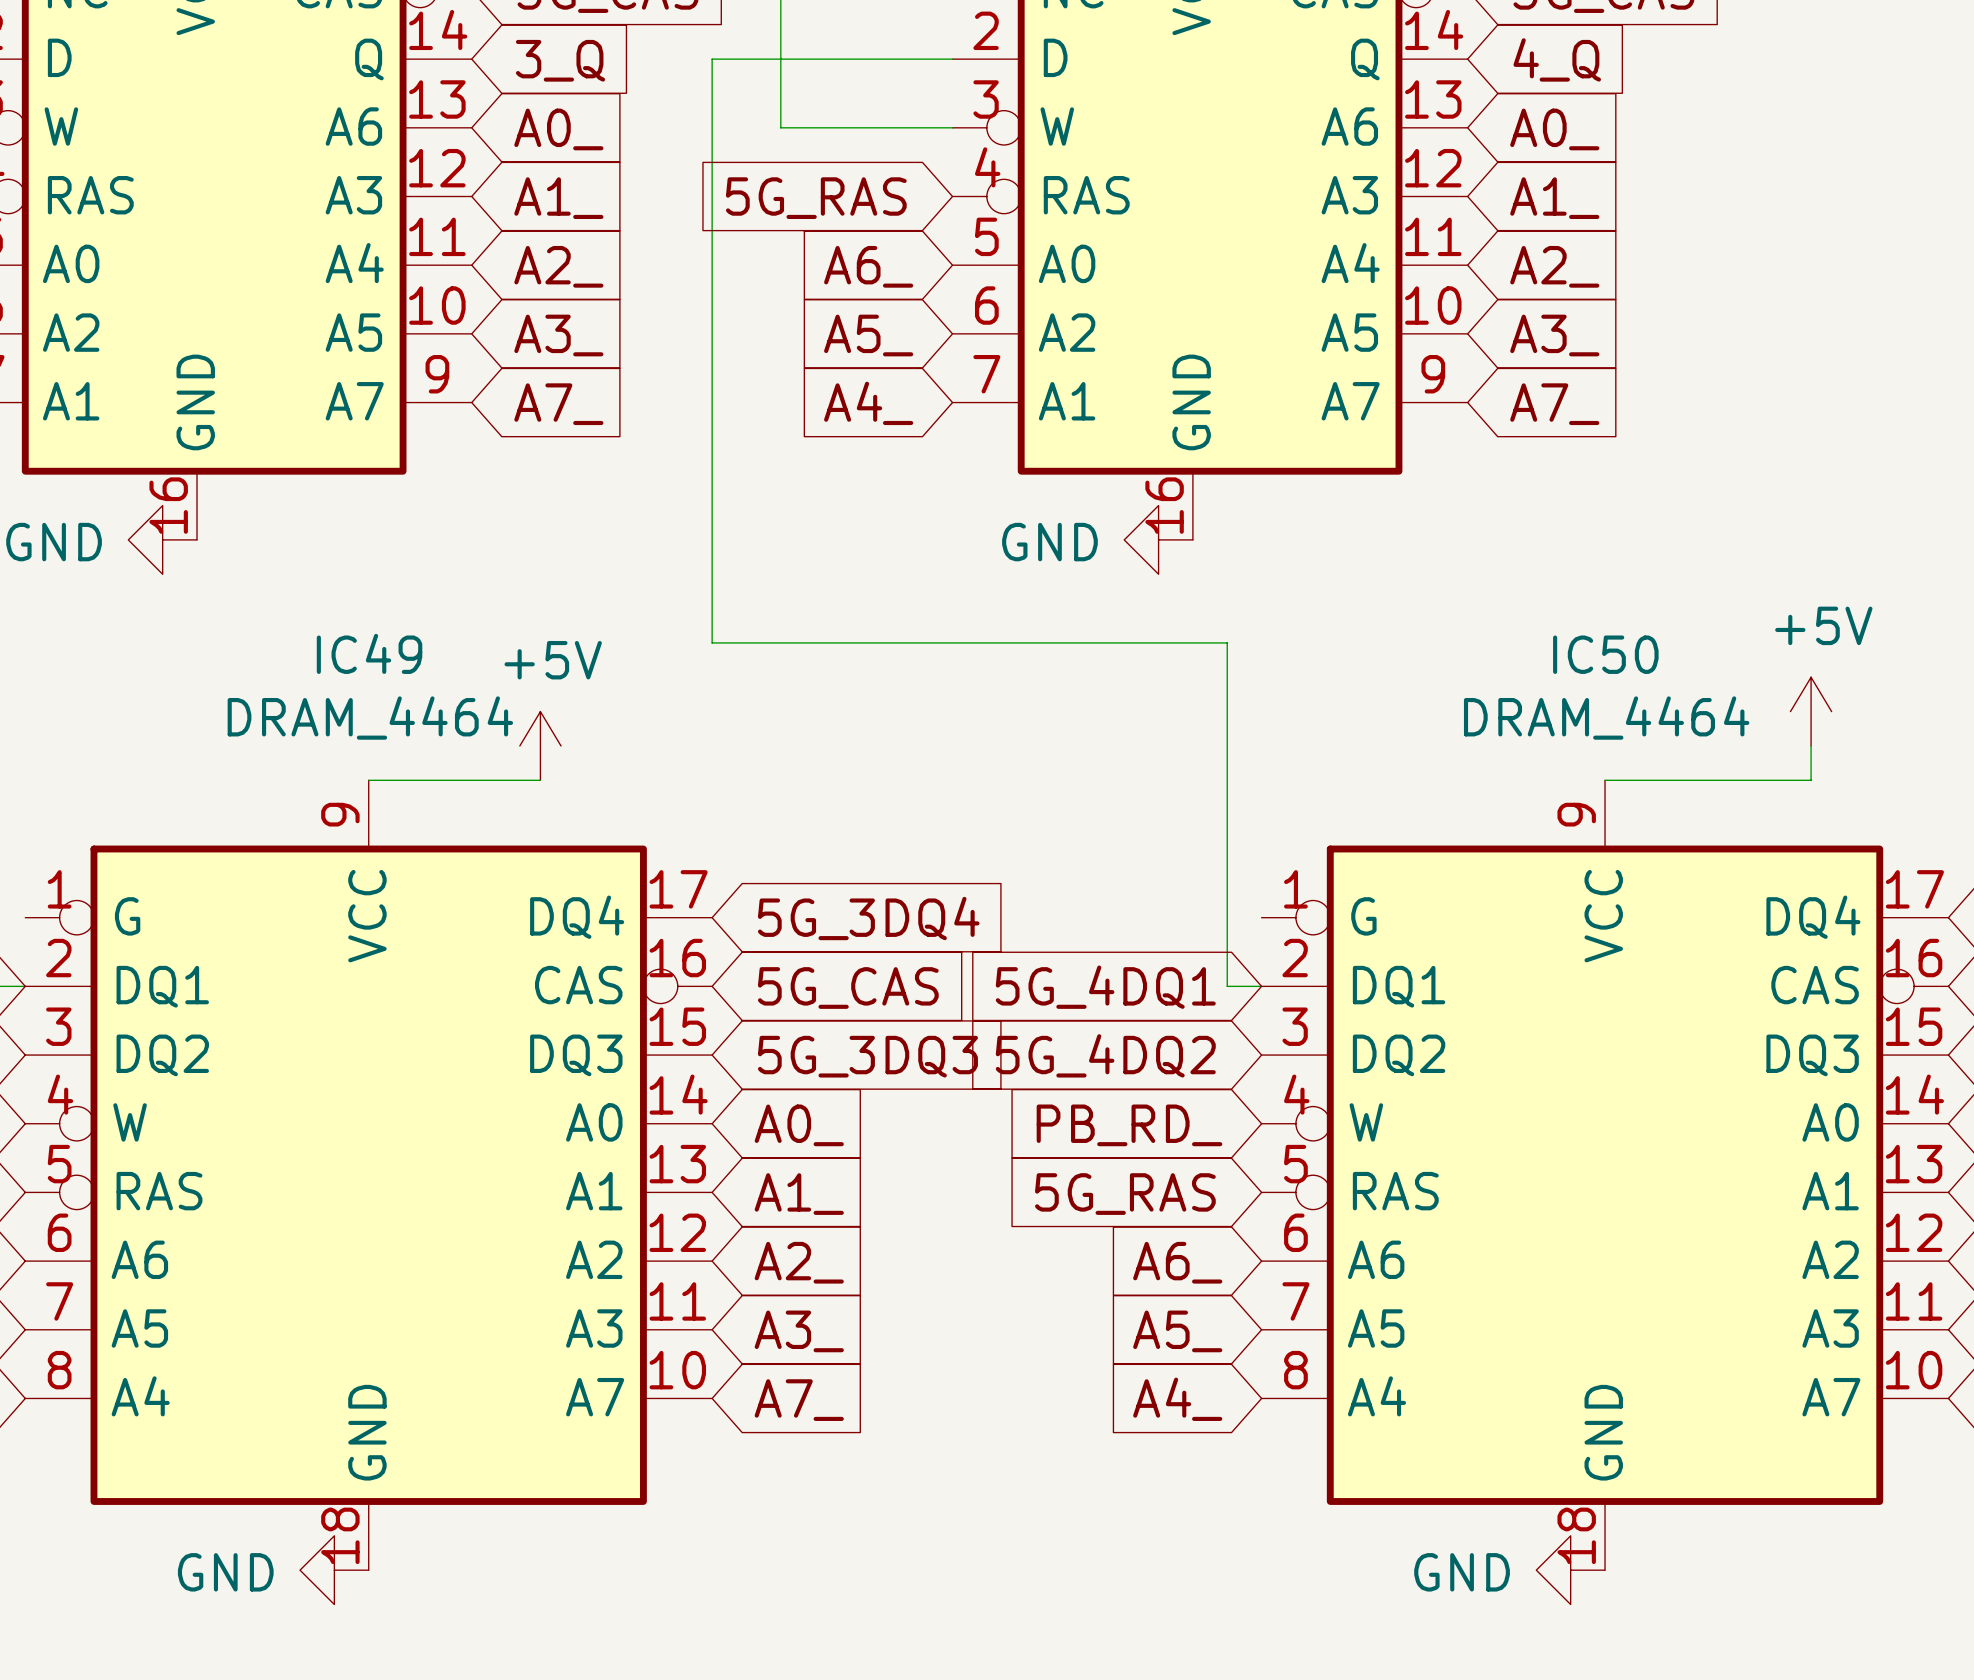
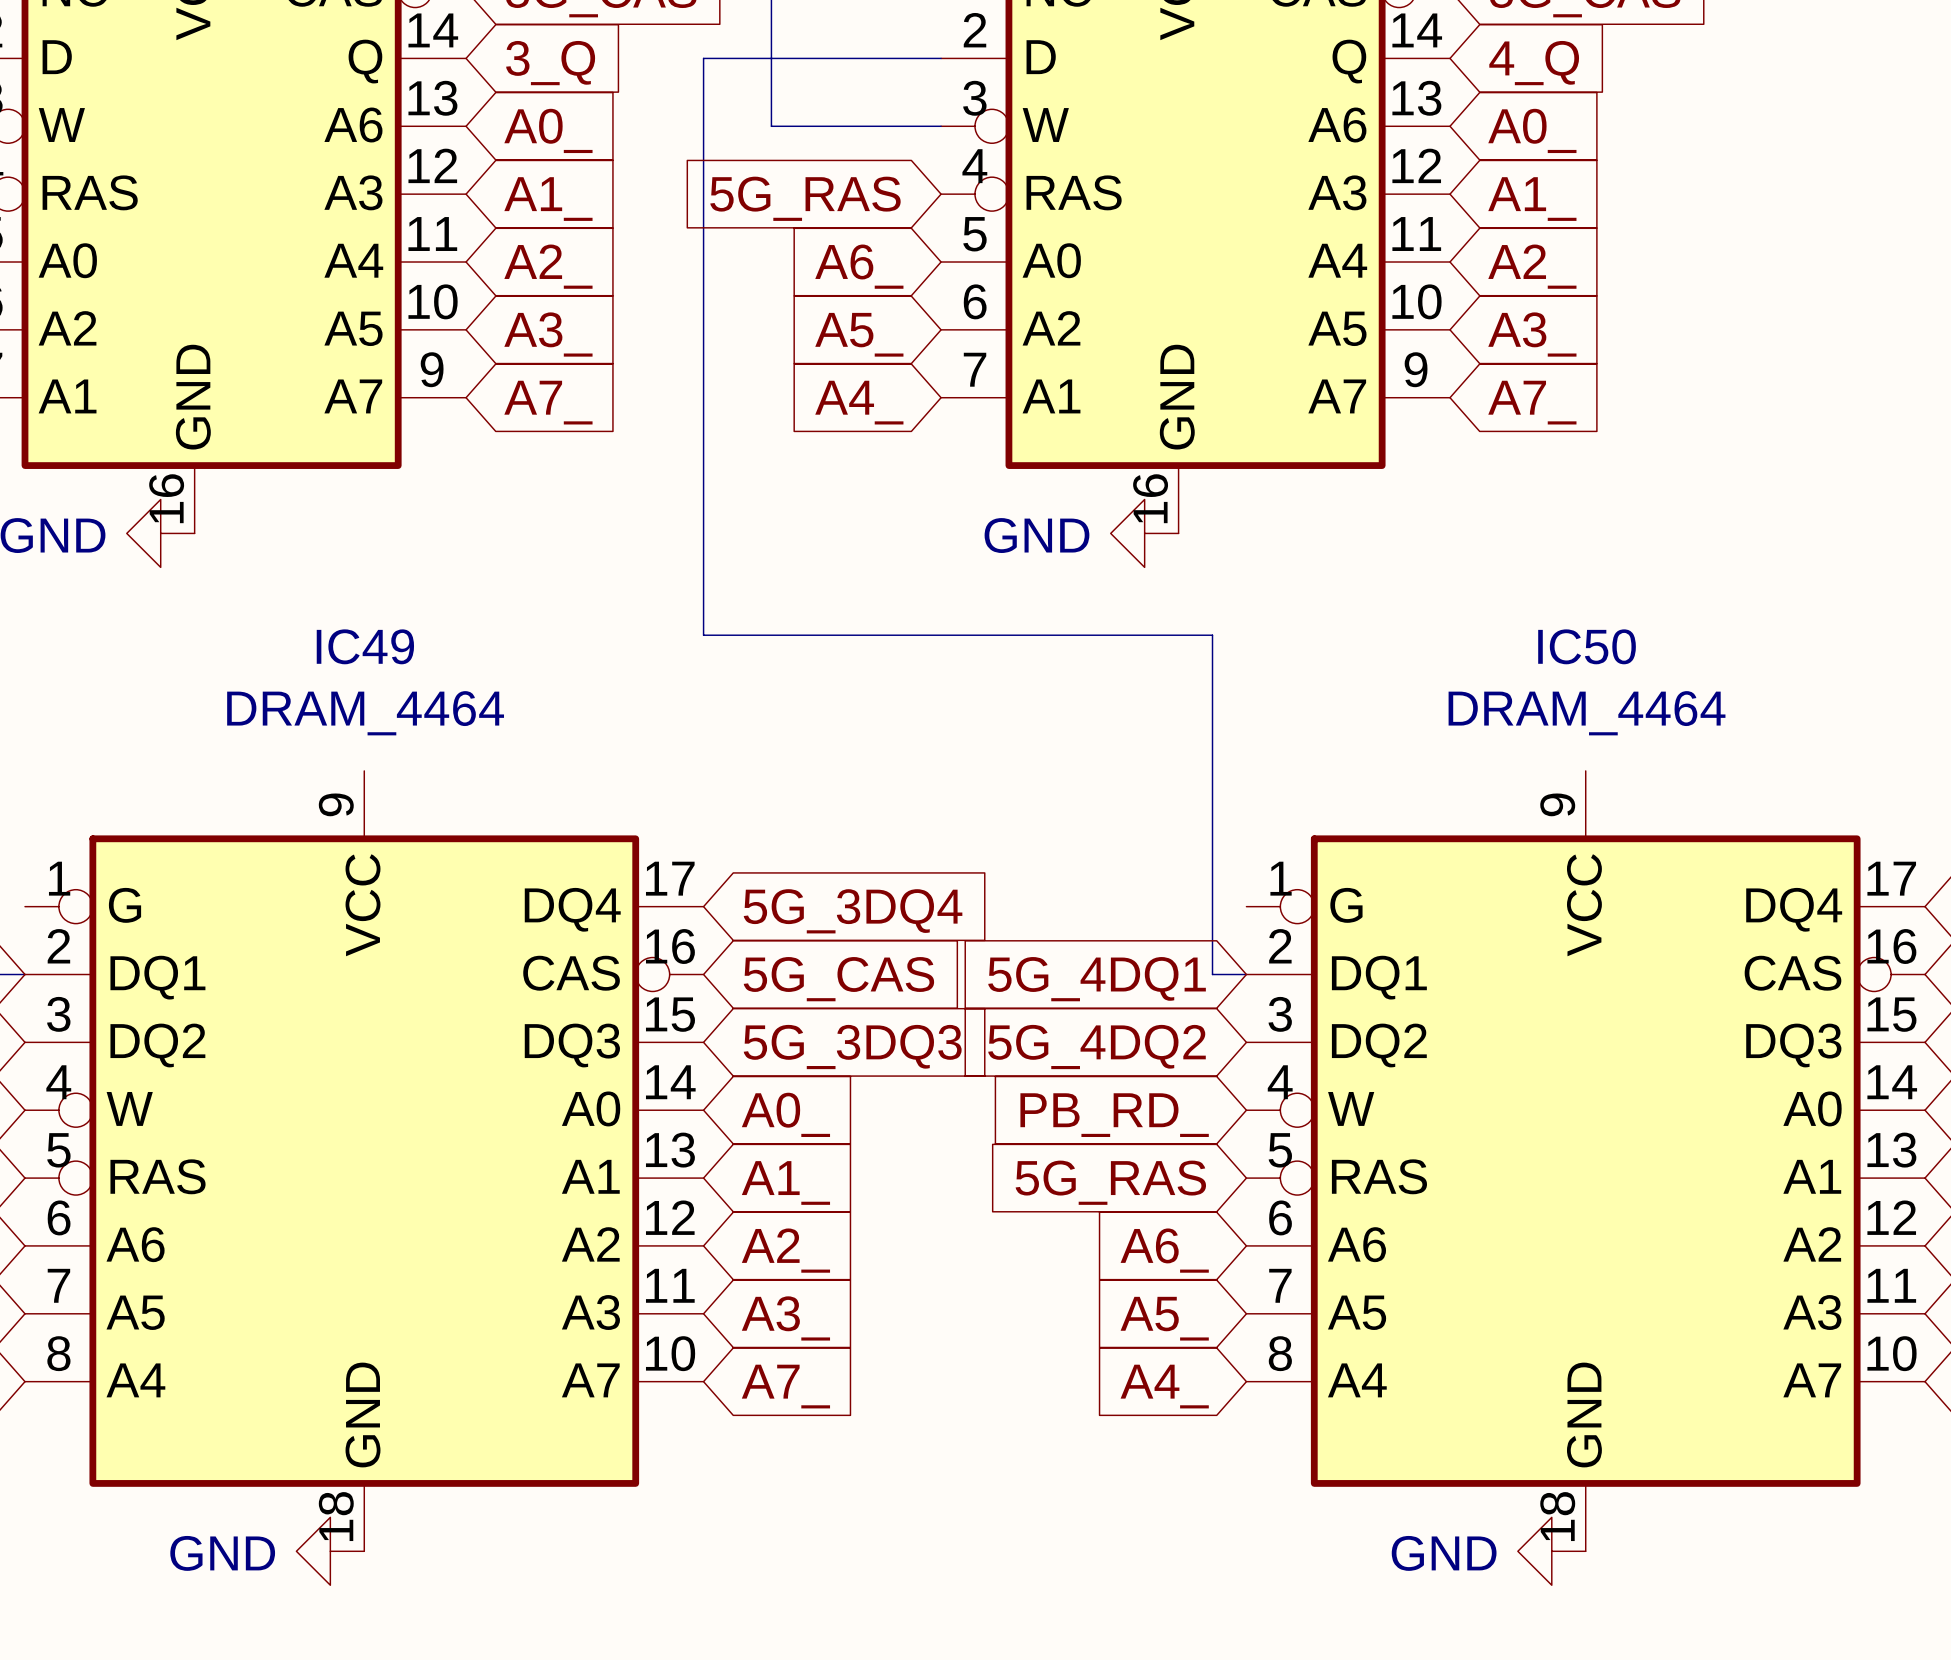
power symbol: +5V (1811, 711) -> none
power symbol: +5V (540, 745) -> none
wire: (1811, 745) (1811, 780) (1605, 780) -> none
wire: (368, 780) (540, 780) -> none

